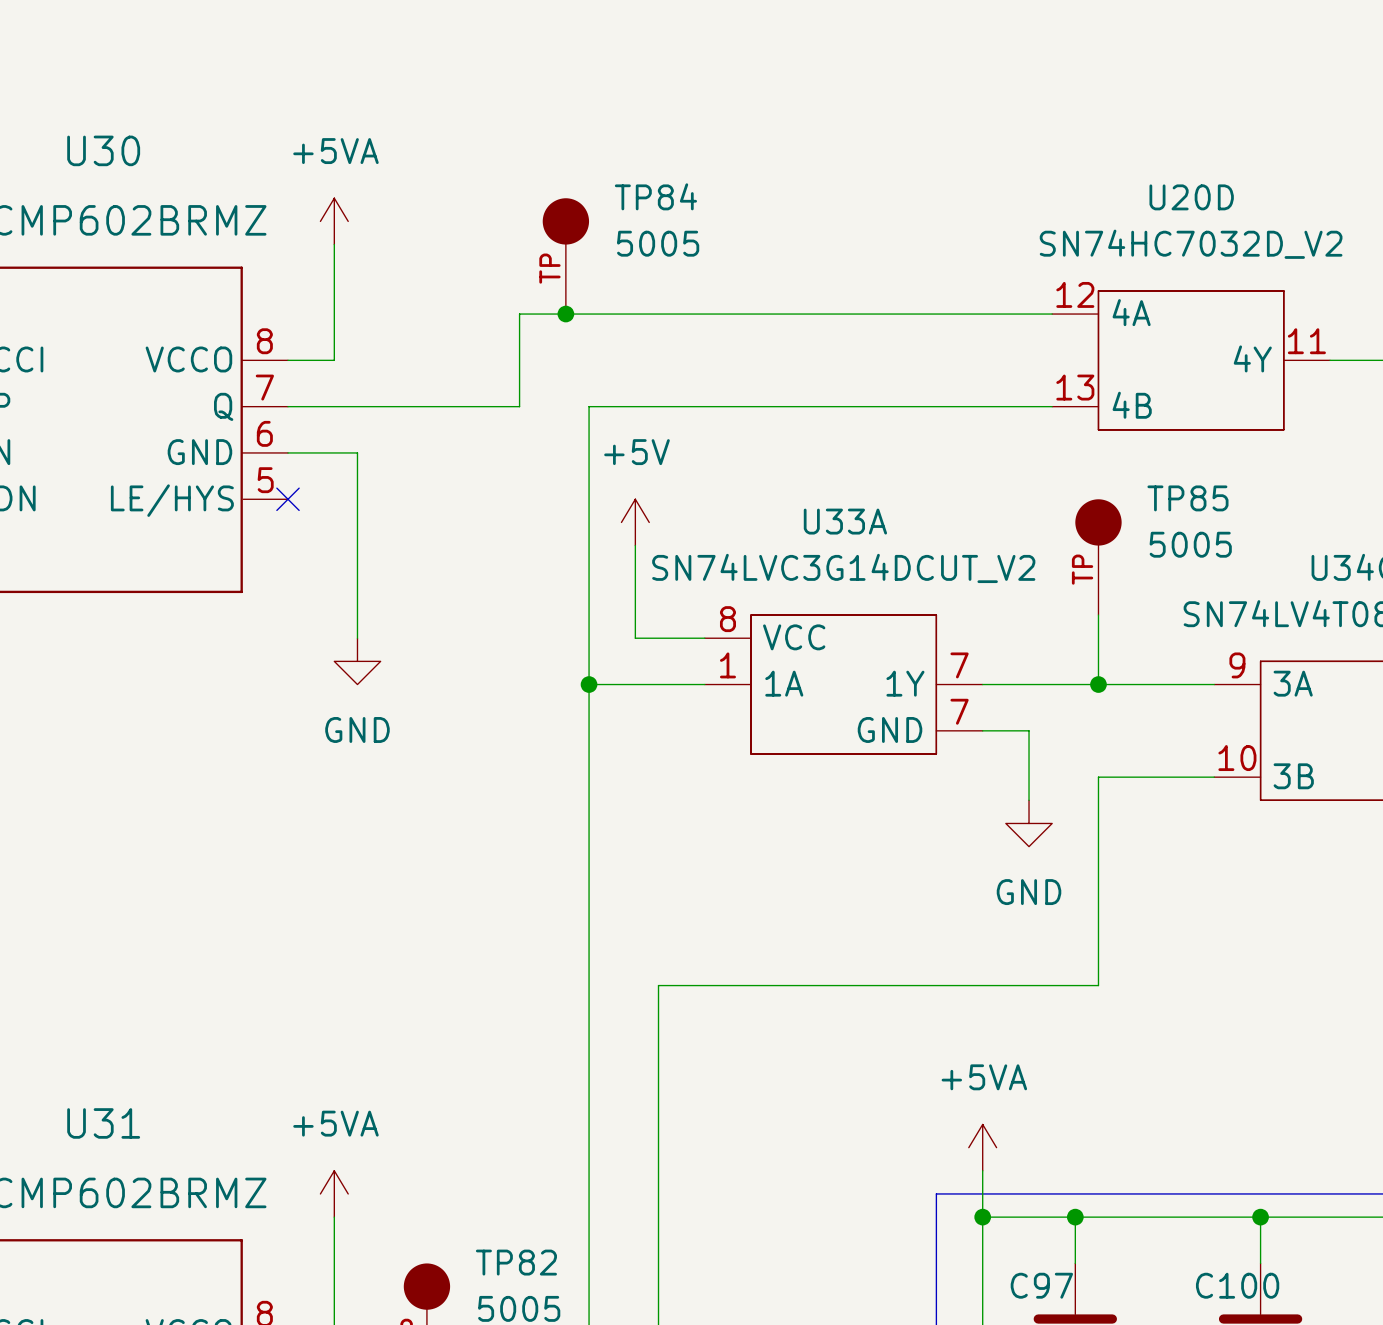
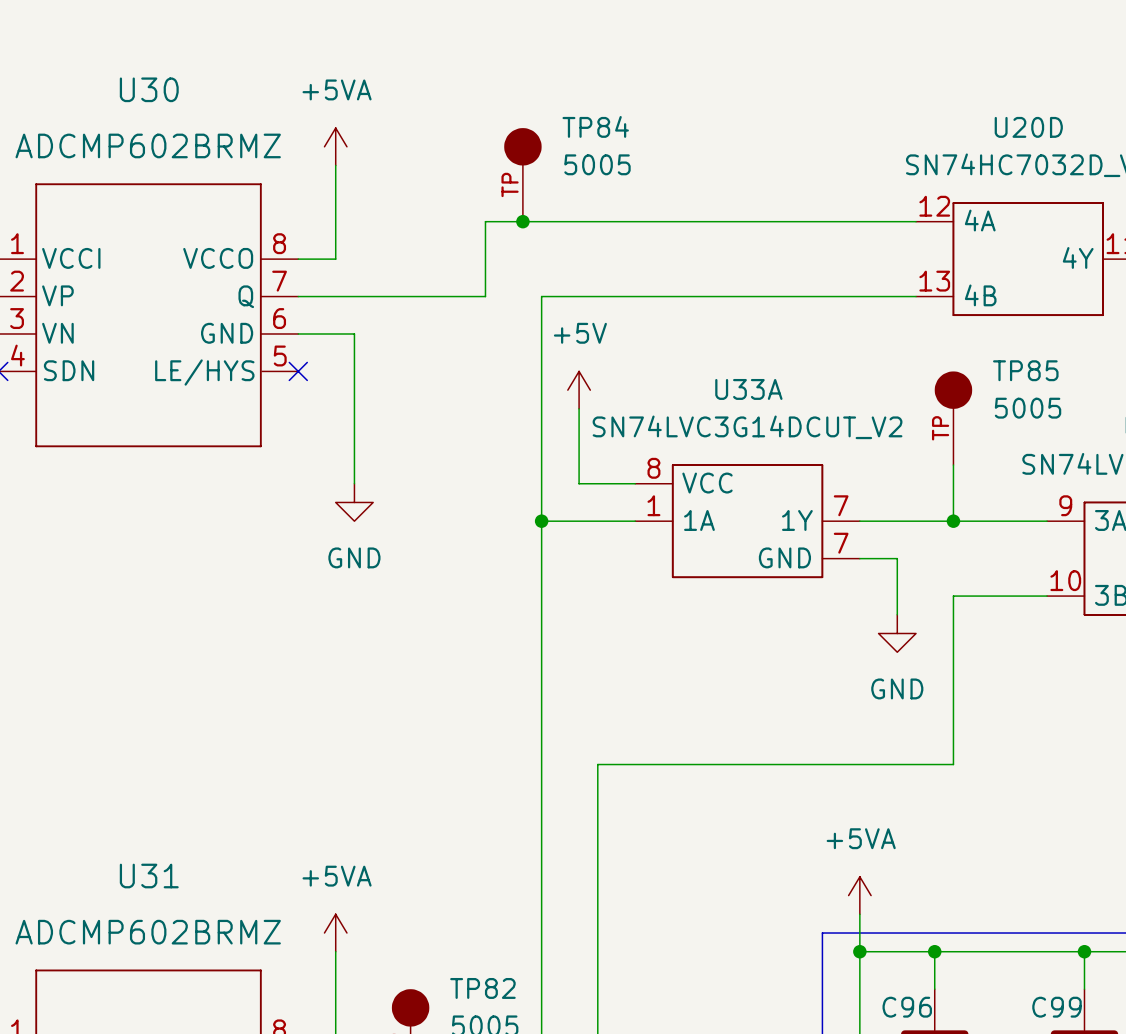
C97 name: C97 (1041, 1285) -> C96 (907, 1007)
C100 name: C100 (1237, 1285) -> C99 (1056, 1007)

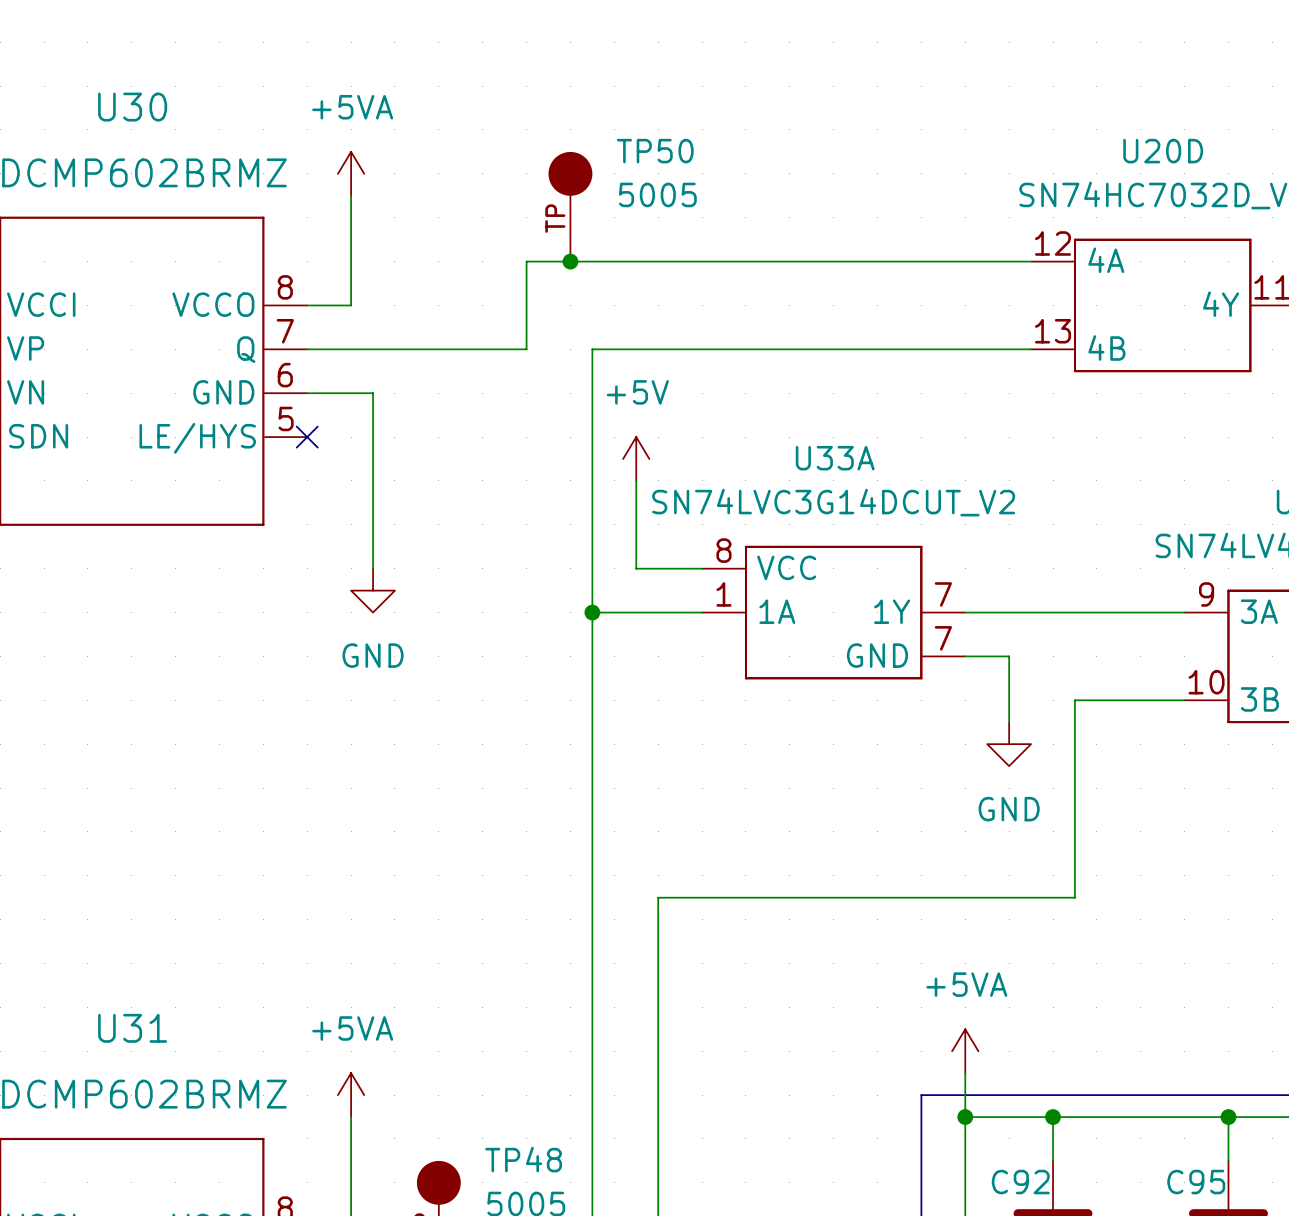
TP84 name: TP84 (595, 126) -> TP50 (655, 151)
TP85: 5005 (953, 418) -> none
wire: (953, 465) (953, 521) -> none
junction: (953, 521) -> none
TP82 name: TP82 (482, 988) -> TP48 (523, 1159)
C96 name: C96 (907, 1007) -> C92 (1020, 1182)
C99 name: C99 (1056, 1007) -> C95 (1196, 1182)

